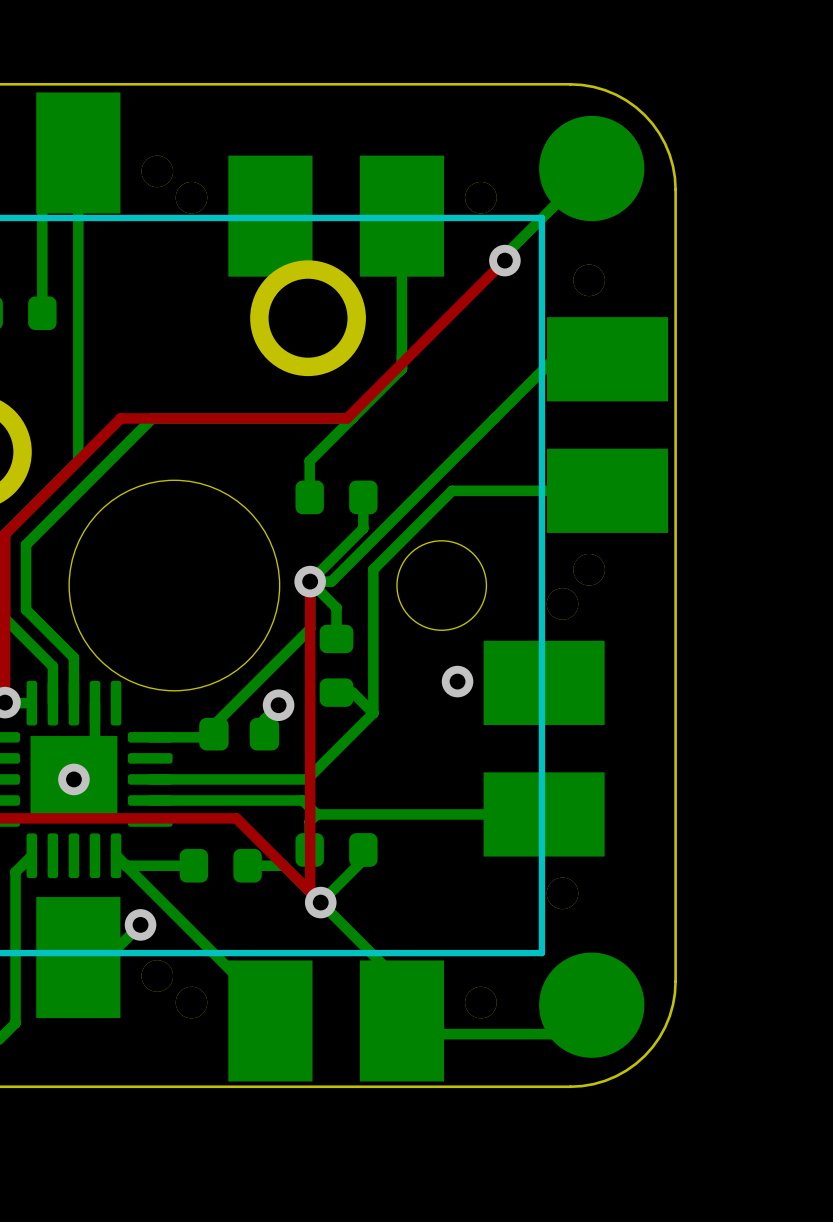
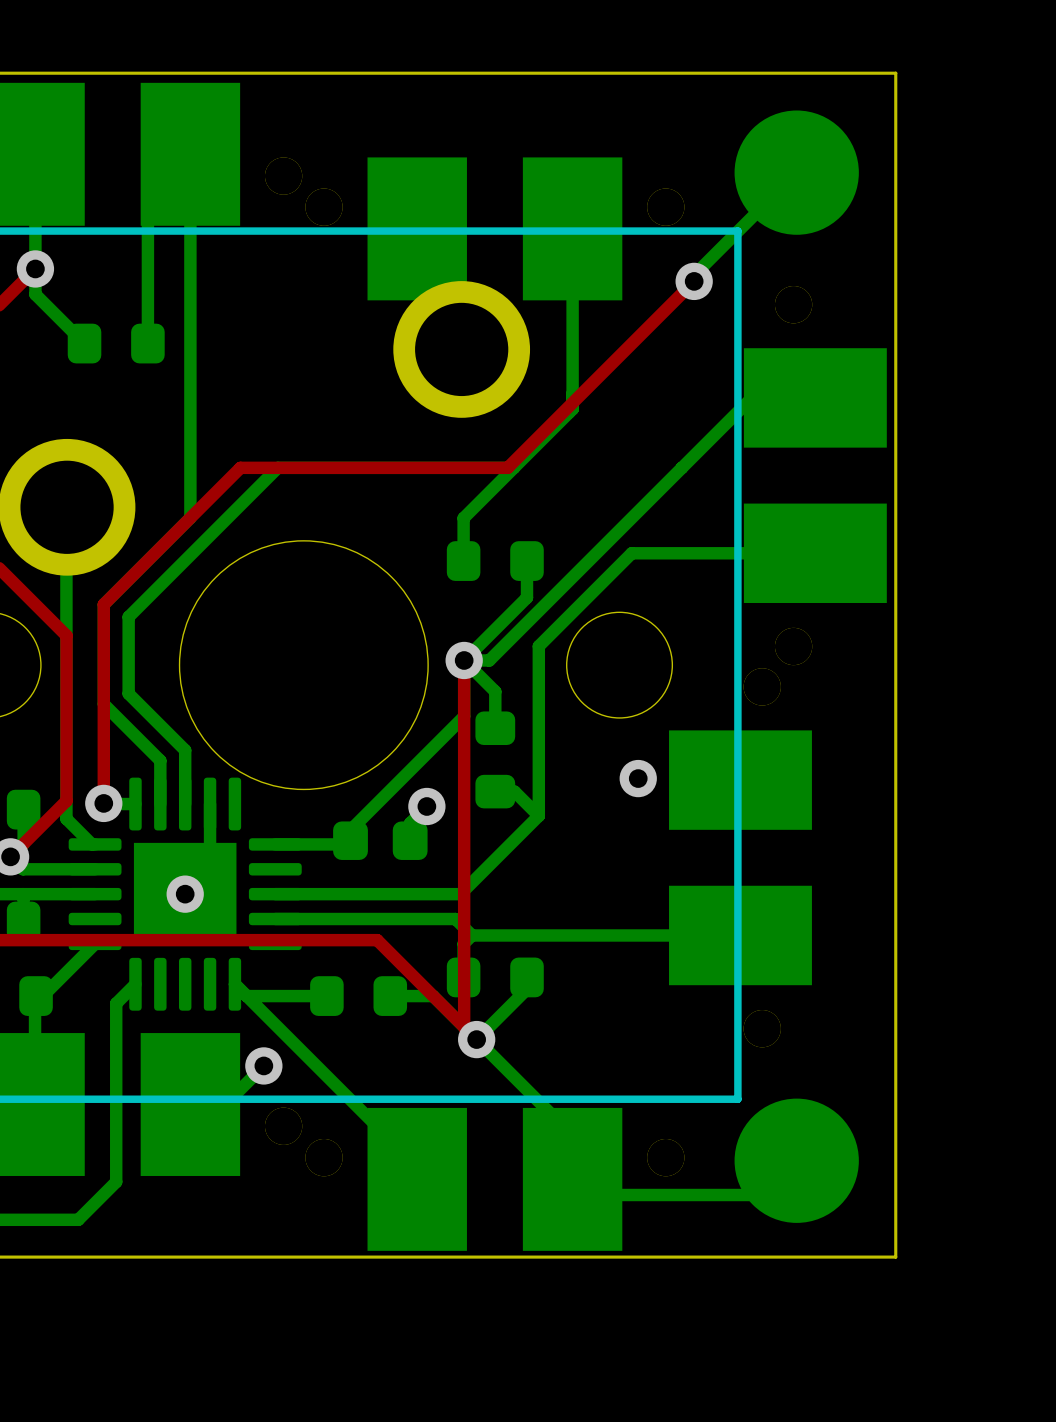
board edge: (570, 84) (605, 90) (626, 100) (644, 115) (659, 133) (669, 154) (675, 189) -> (771, 73) (895, 73) (895, 197)
board edge: (675, 981) (672, 1004) (665, 1027) (644, 1055) (616, 1076) (593, 1084) (570, 1086) -> (895, 1132) (895, 1257) (771, 1257)

